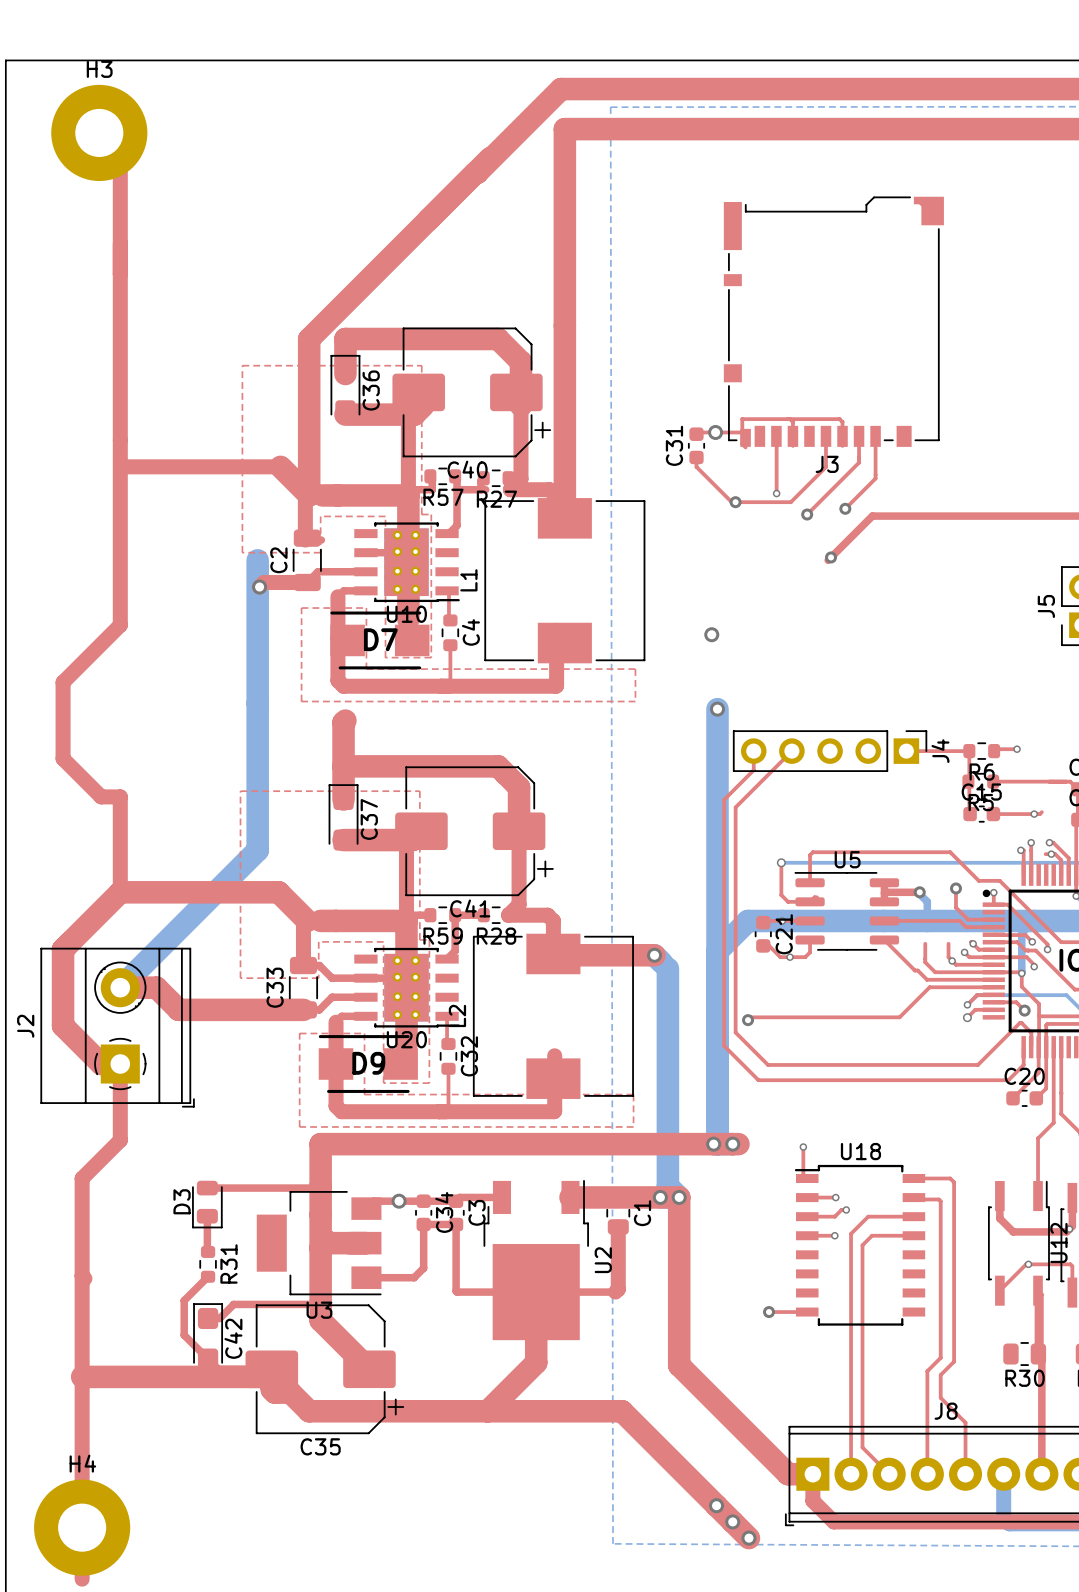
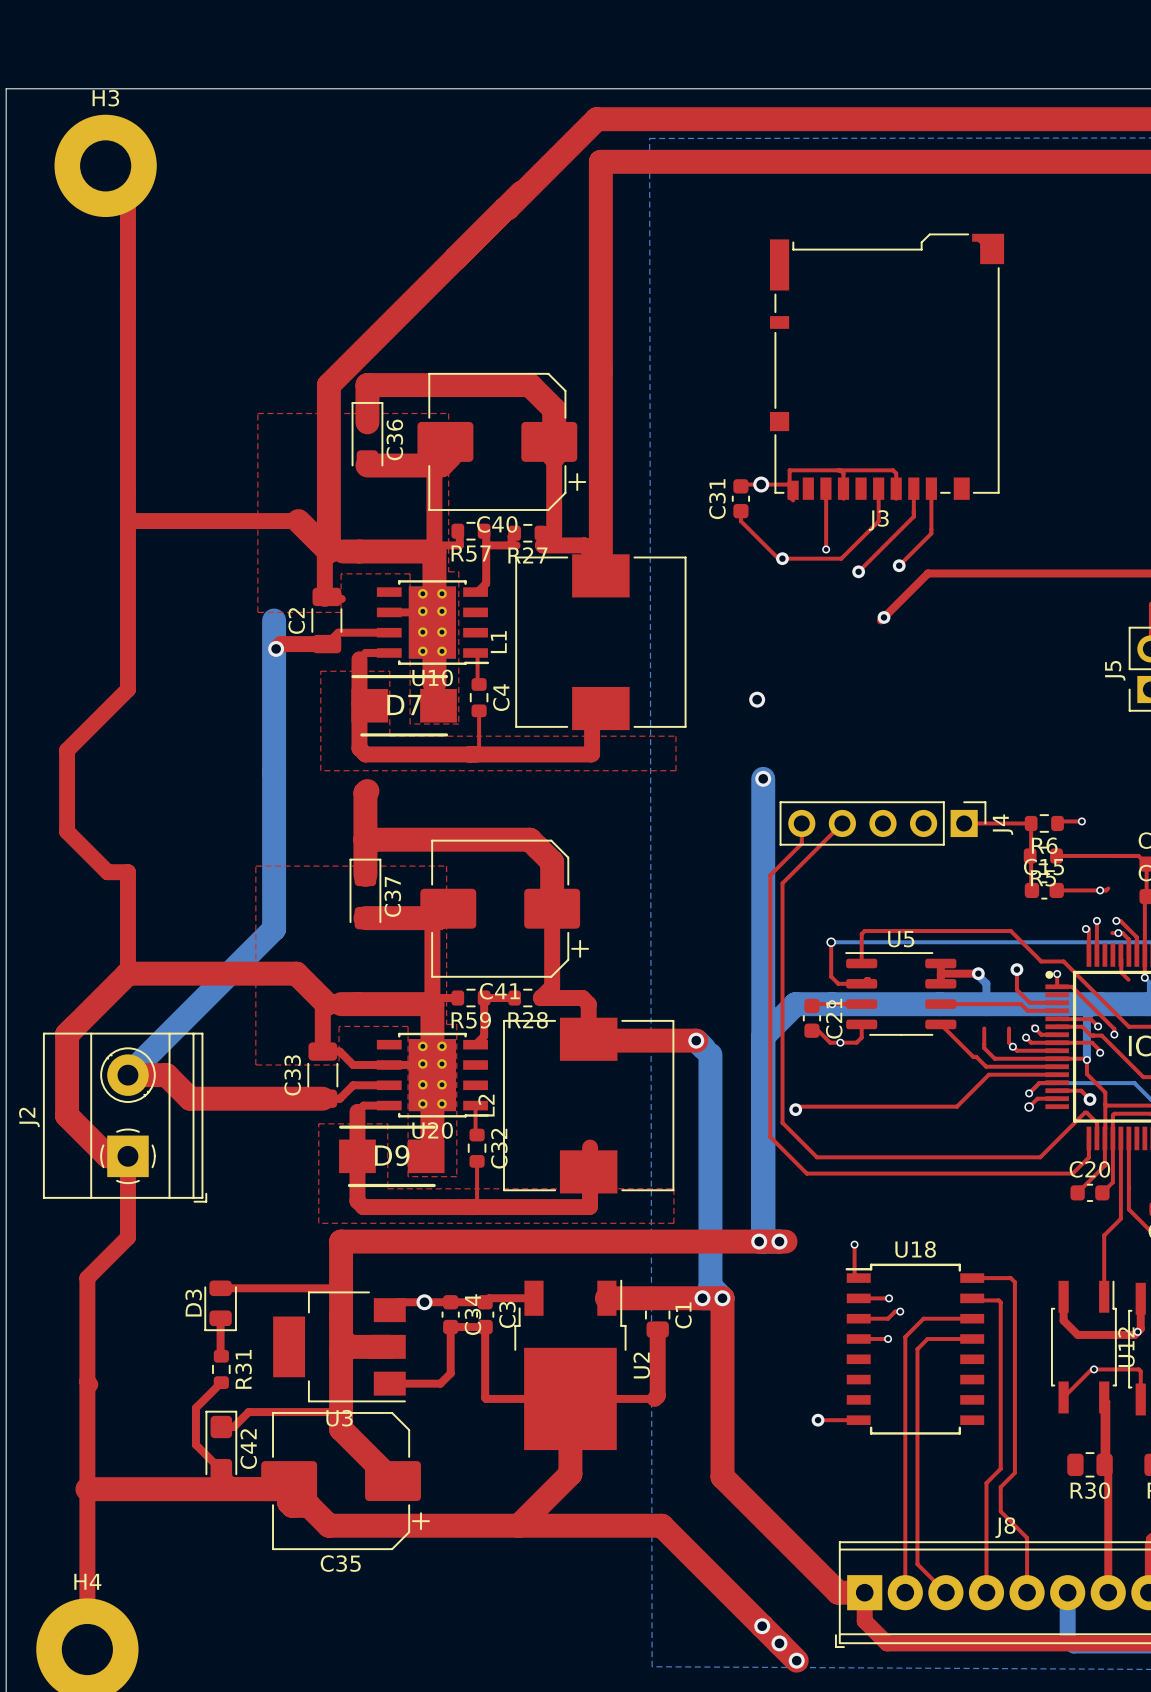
top track: none -> (1120, 955) (1121, 972) (1128, 979)

